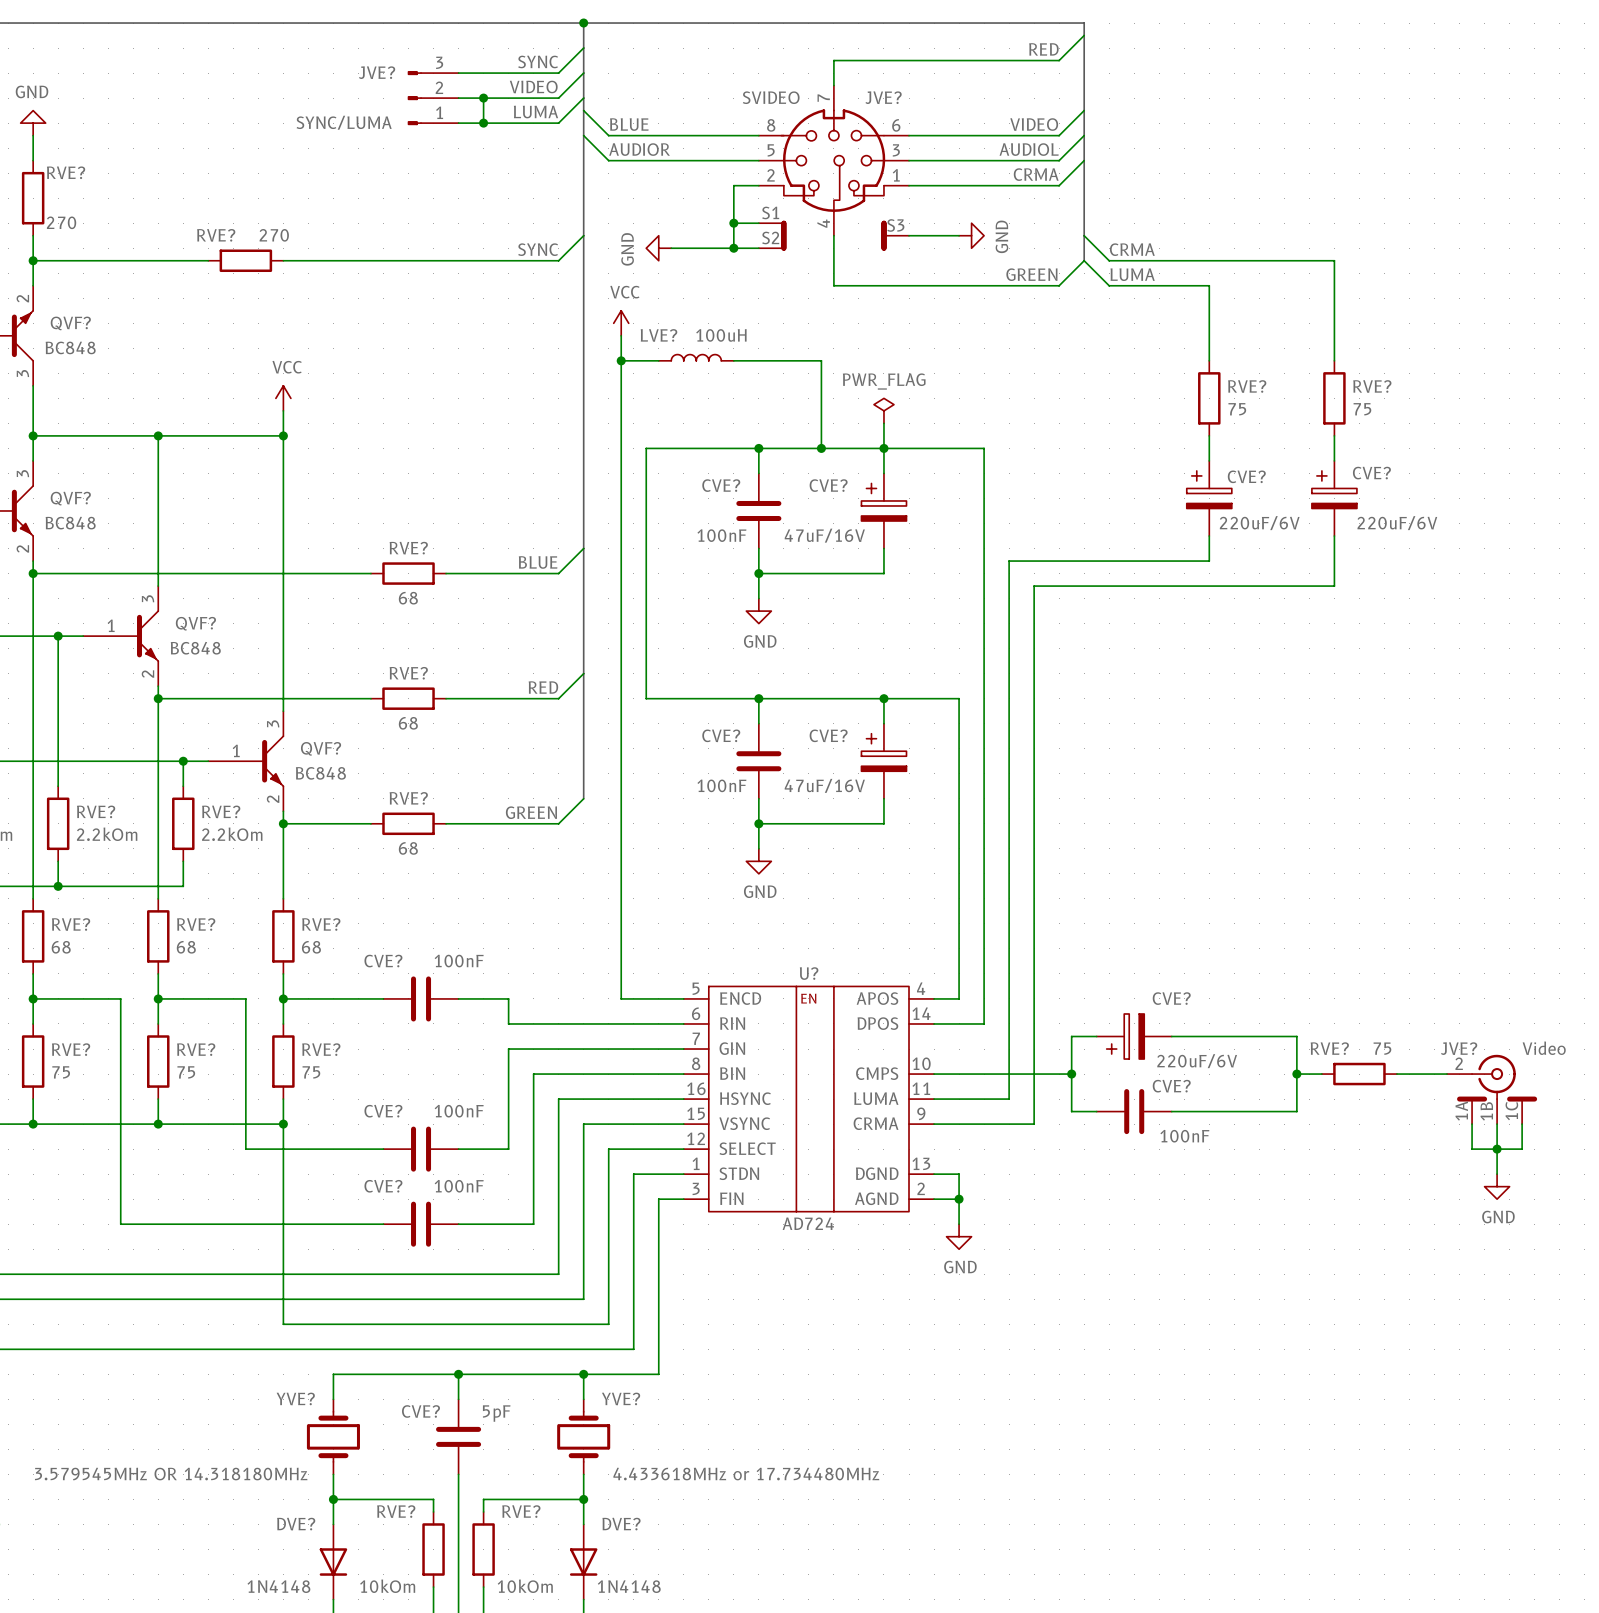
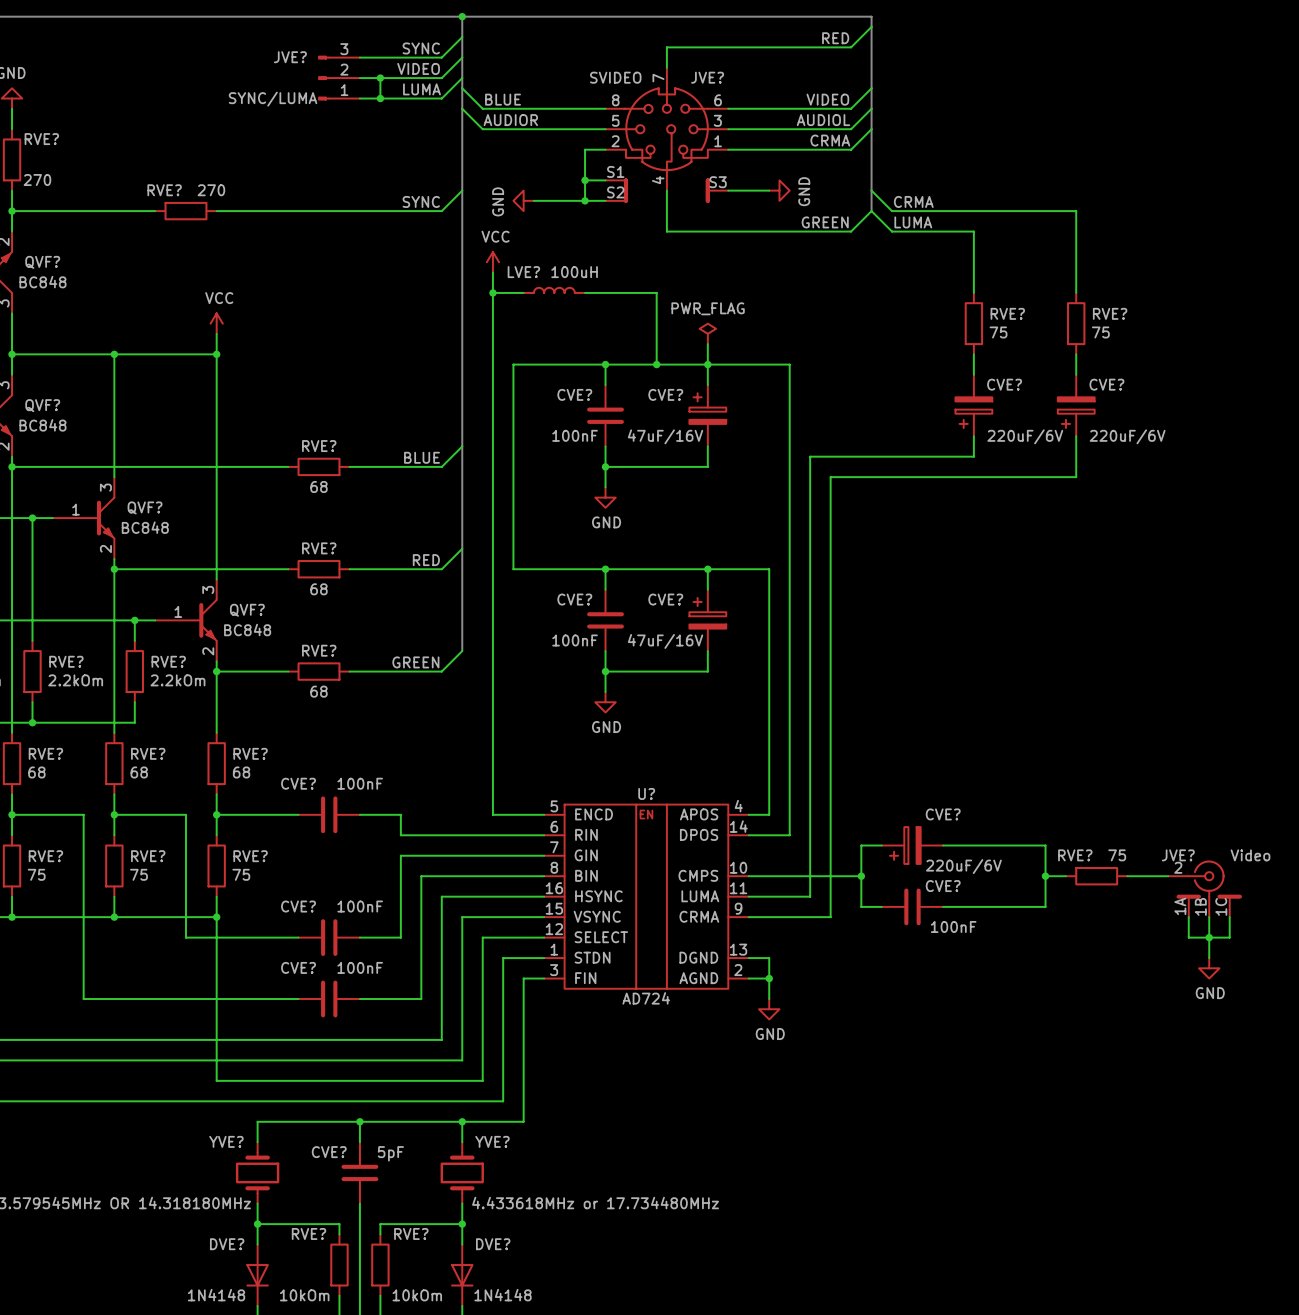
CVE? flip: as is (1209, 489) -> up-down (973, 412)
CVE? flip: as is (1334, 489) -> up-down (1076, 412)

